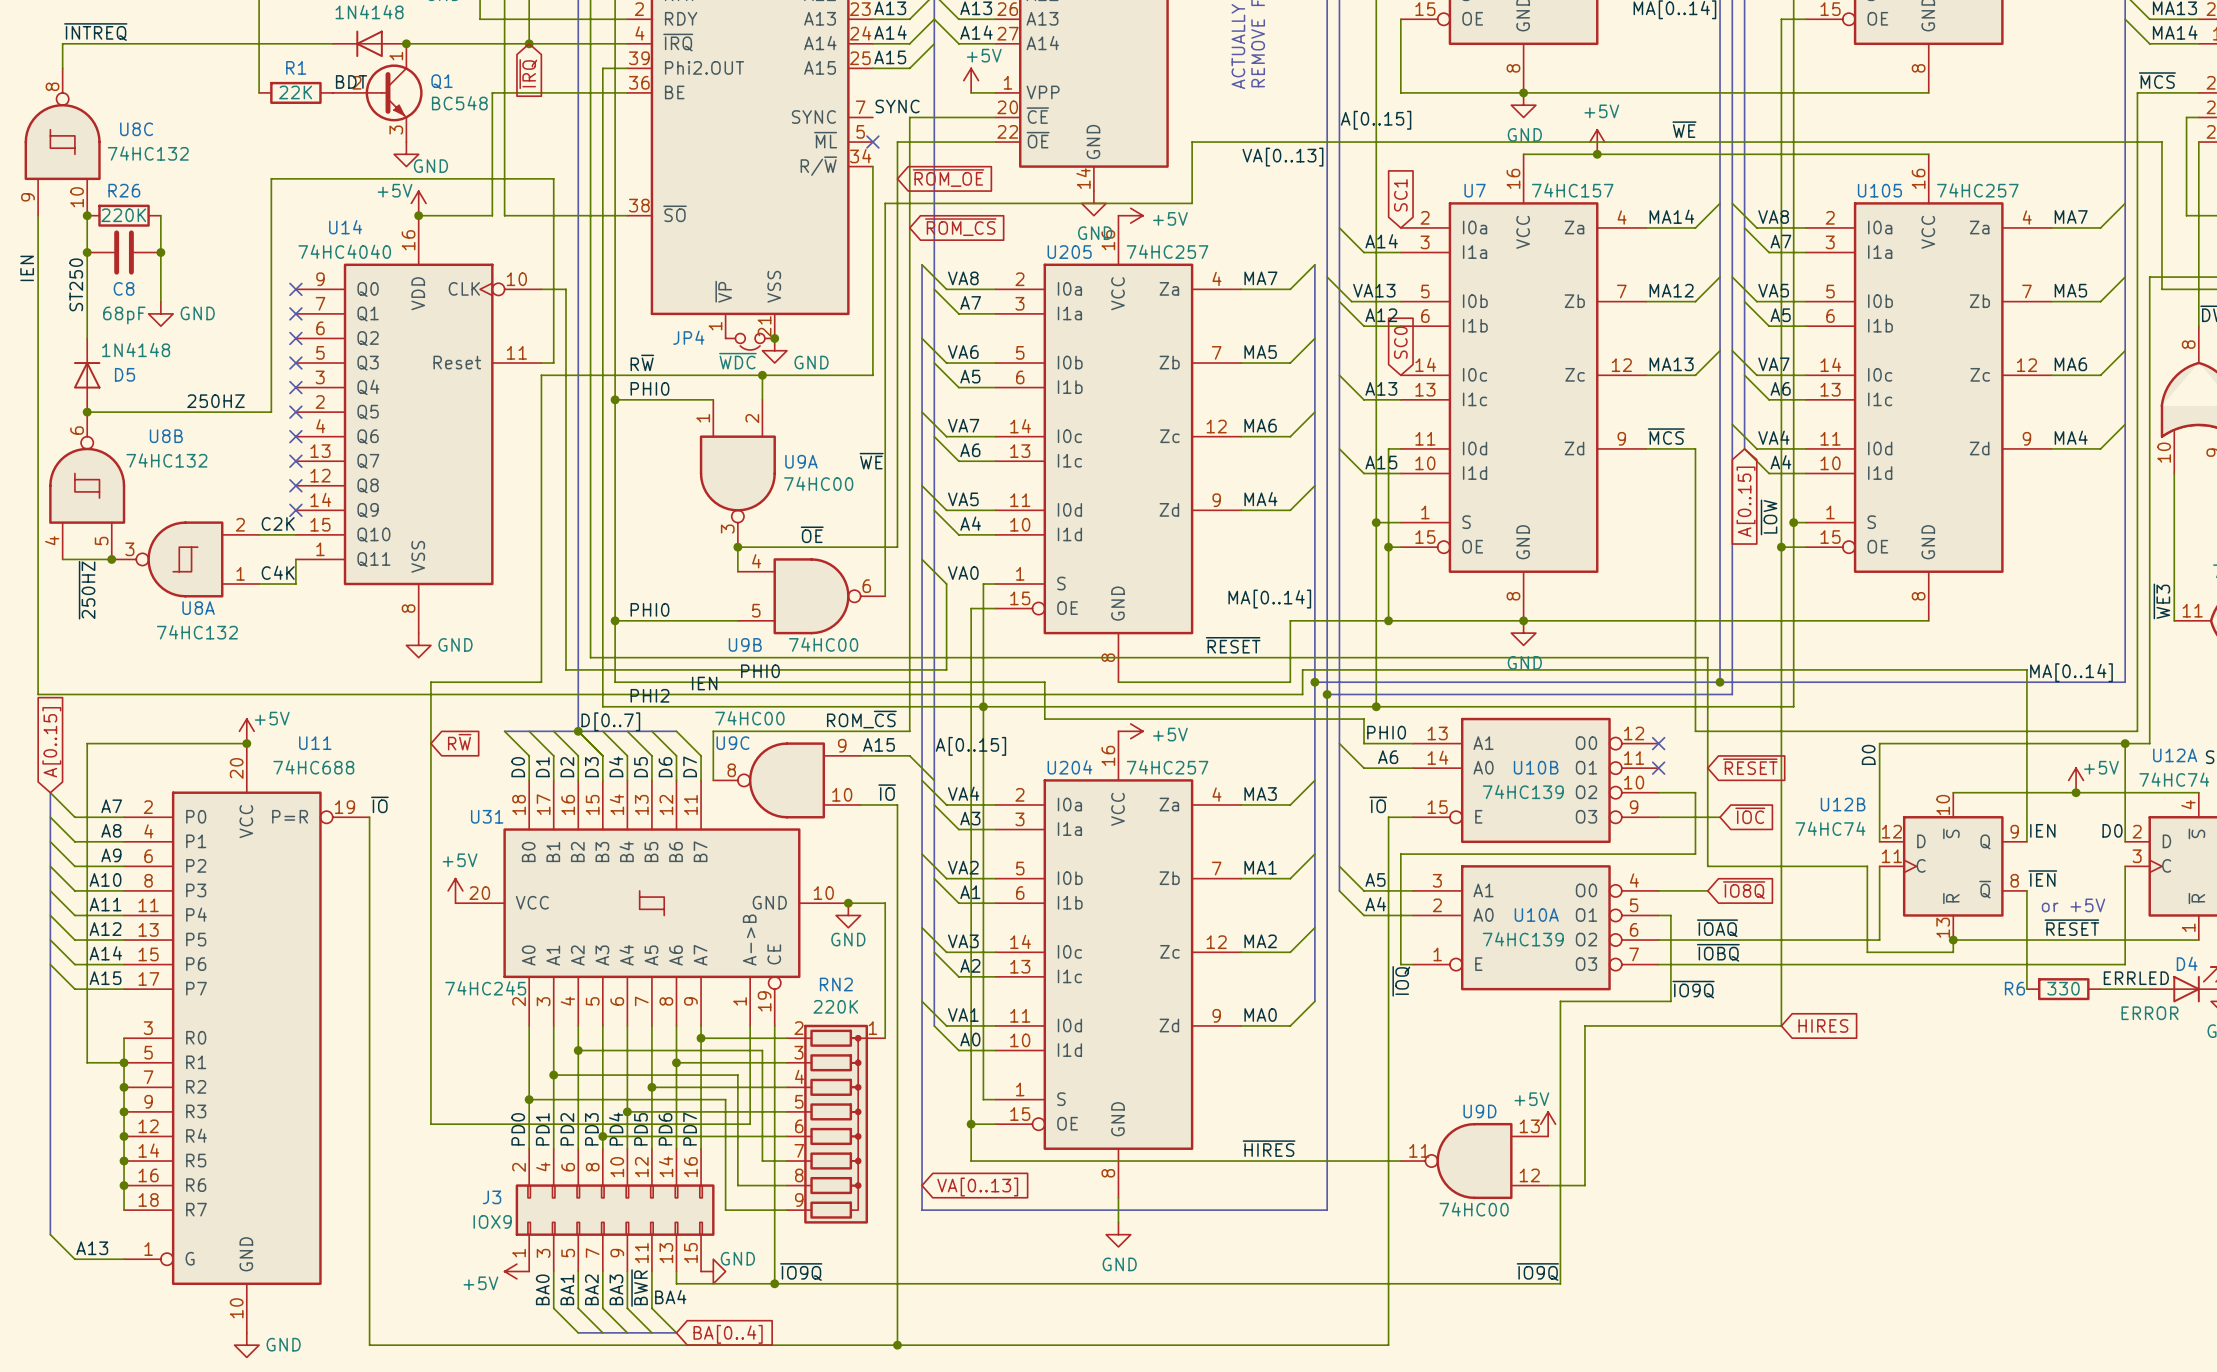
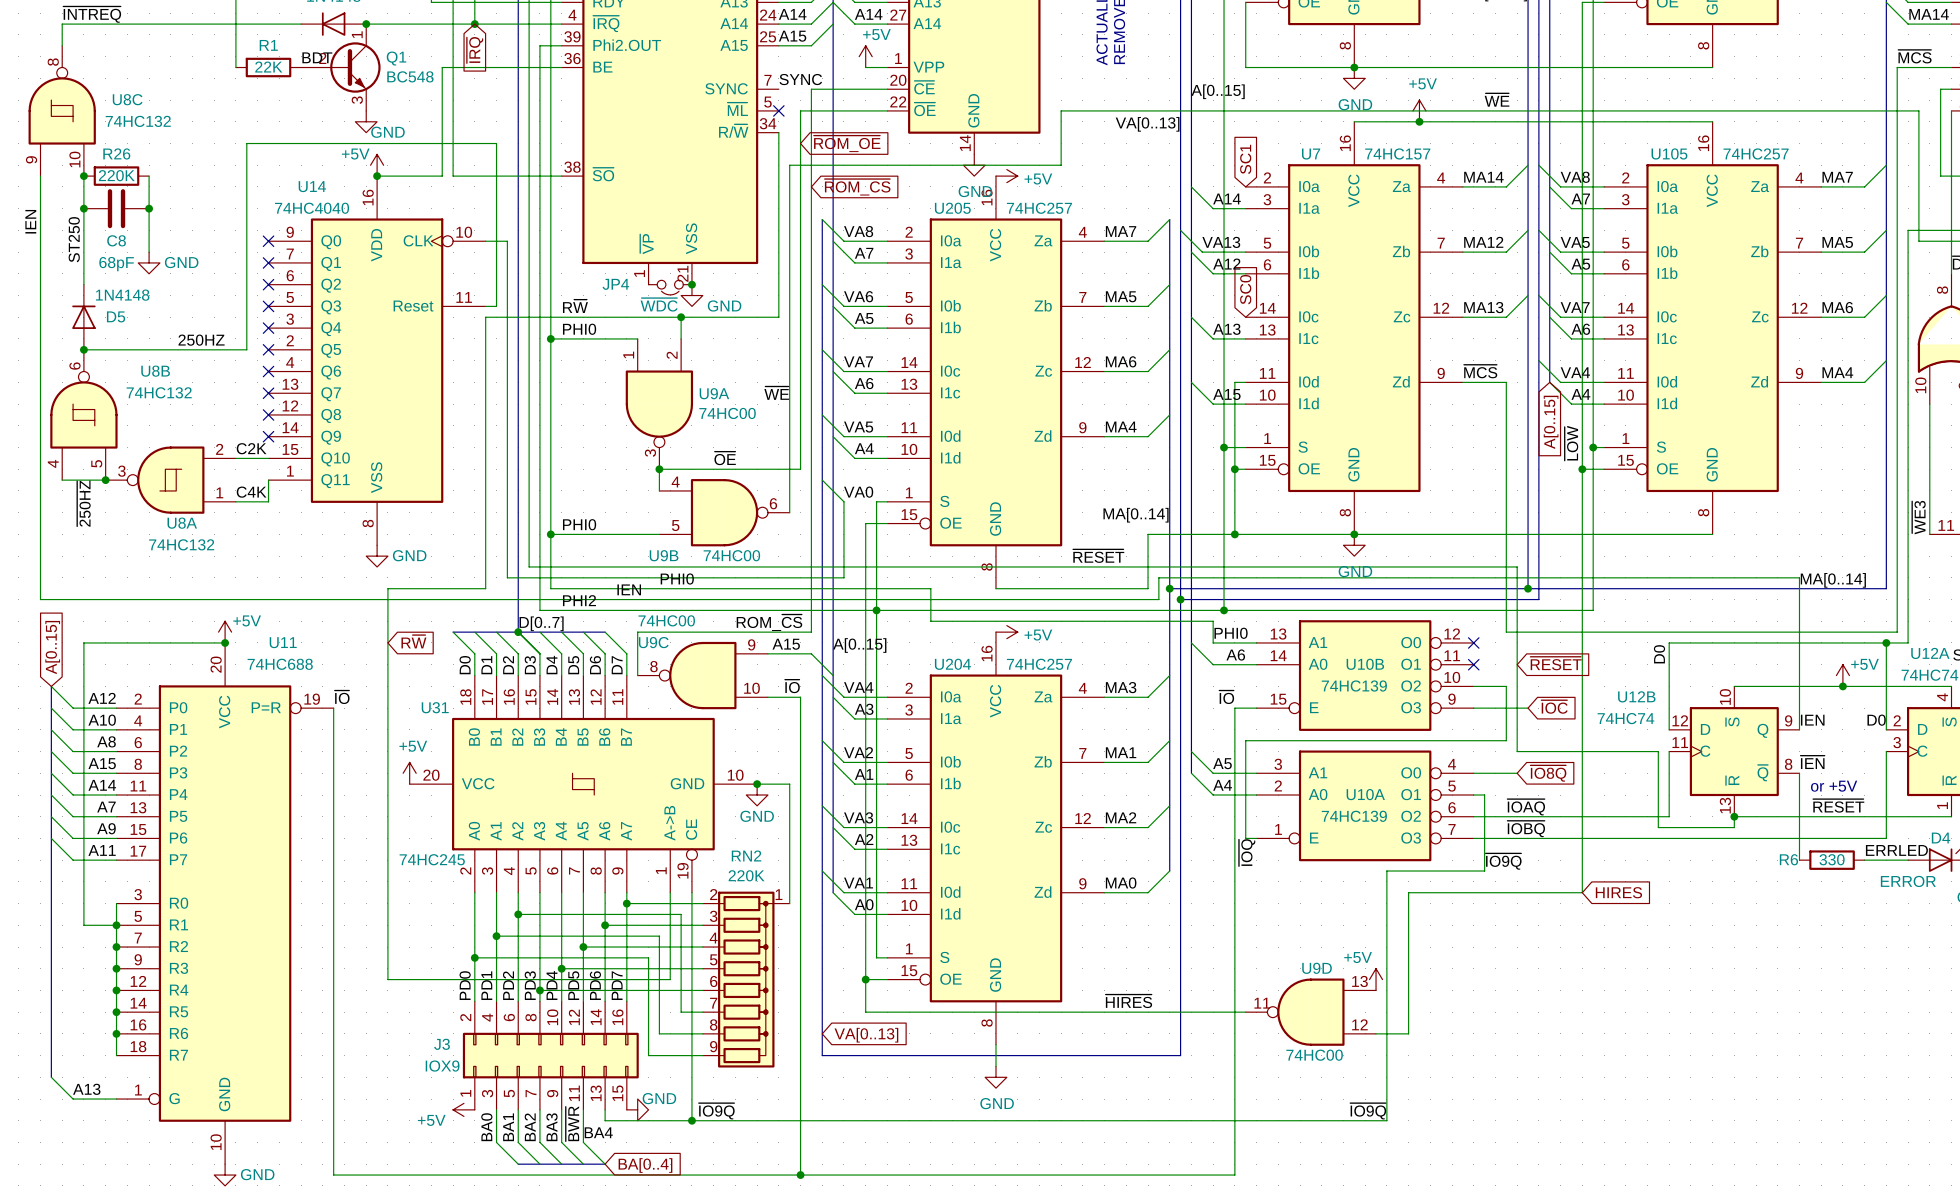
label: A7 (111, 806) -> A12 (102, 698)
label: A8 (111, 830) -> A10 (102, 720)
label: A9 (111, 855) -> A8 (106, 741)
label: A10 (105, 879) -> A15 (102, 763)
label: A11 (105, 904) -> A14 (102, 785)
label: A12 (105, 929) -> A7 (106, 807)
label: A14 (105, 953) -> A9 (106, 828)
label: A15 (105, 978) -> A11 (102, 850)

